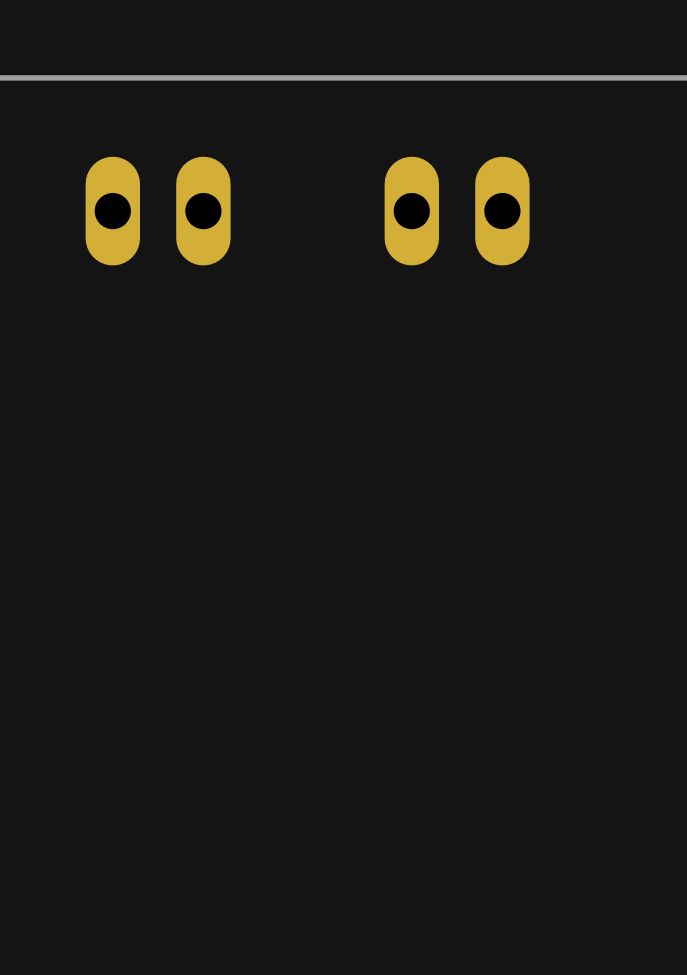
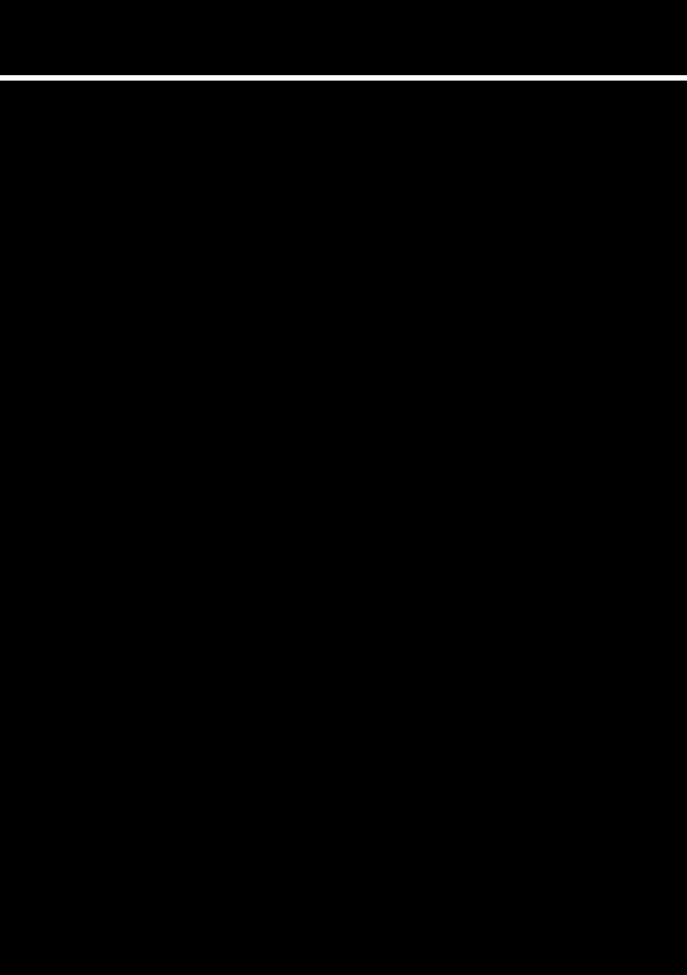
part: (158, 211) -> none
part: (457, 211) -> none

